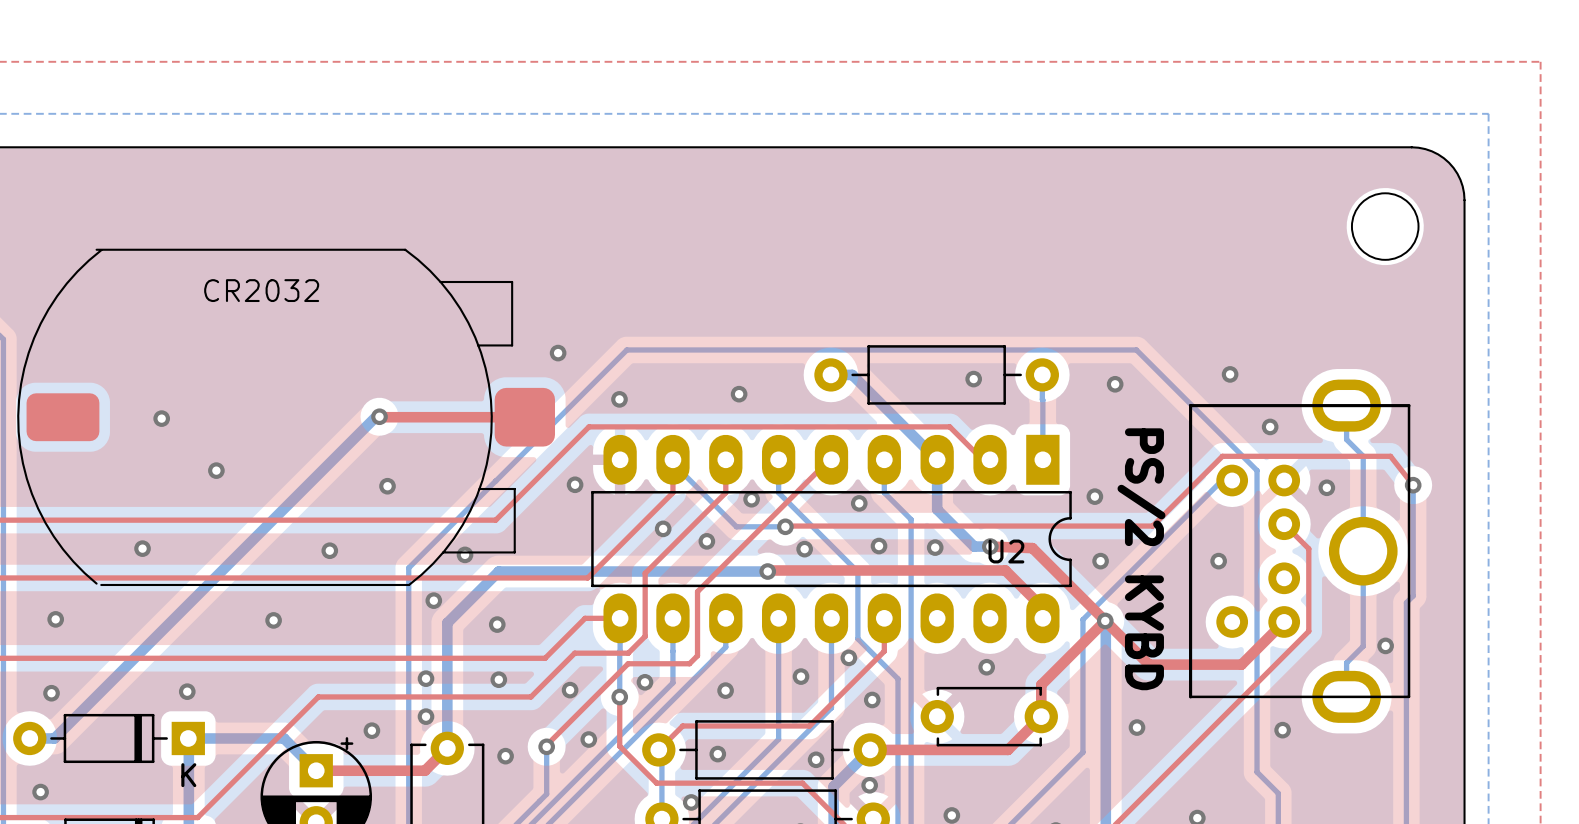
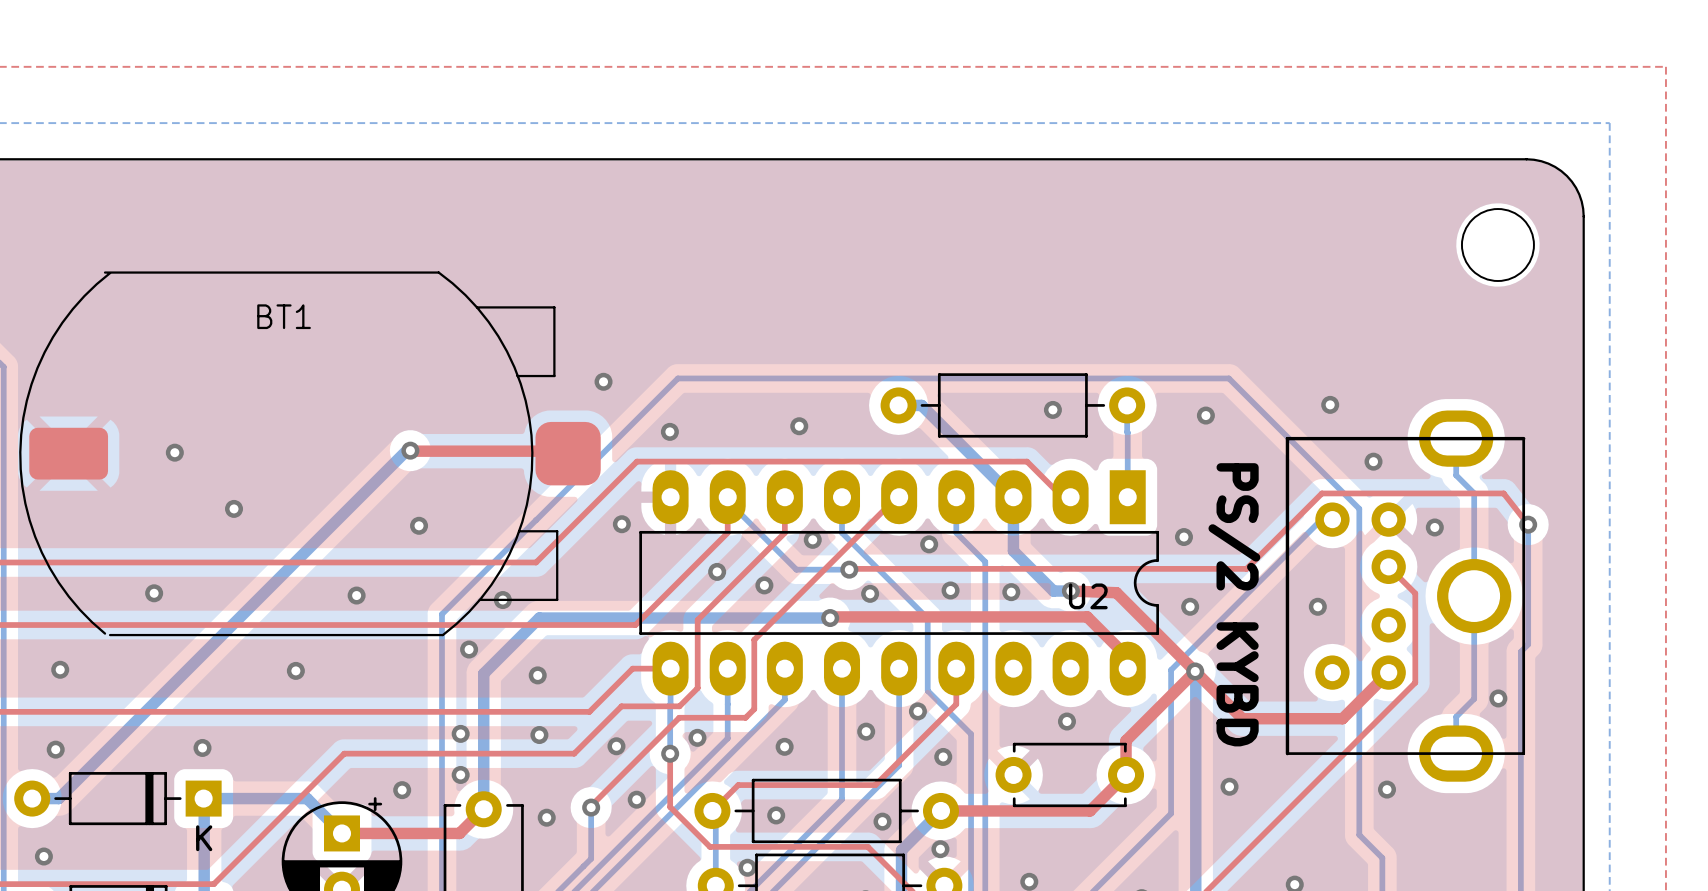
CR2032: (286, 417) -> none
BT1: none -> (309, 453)

